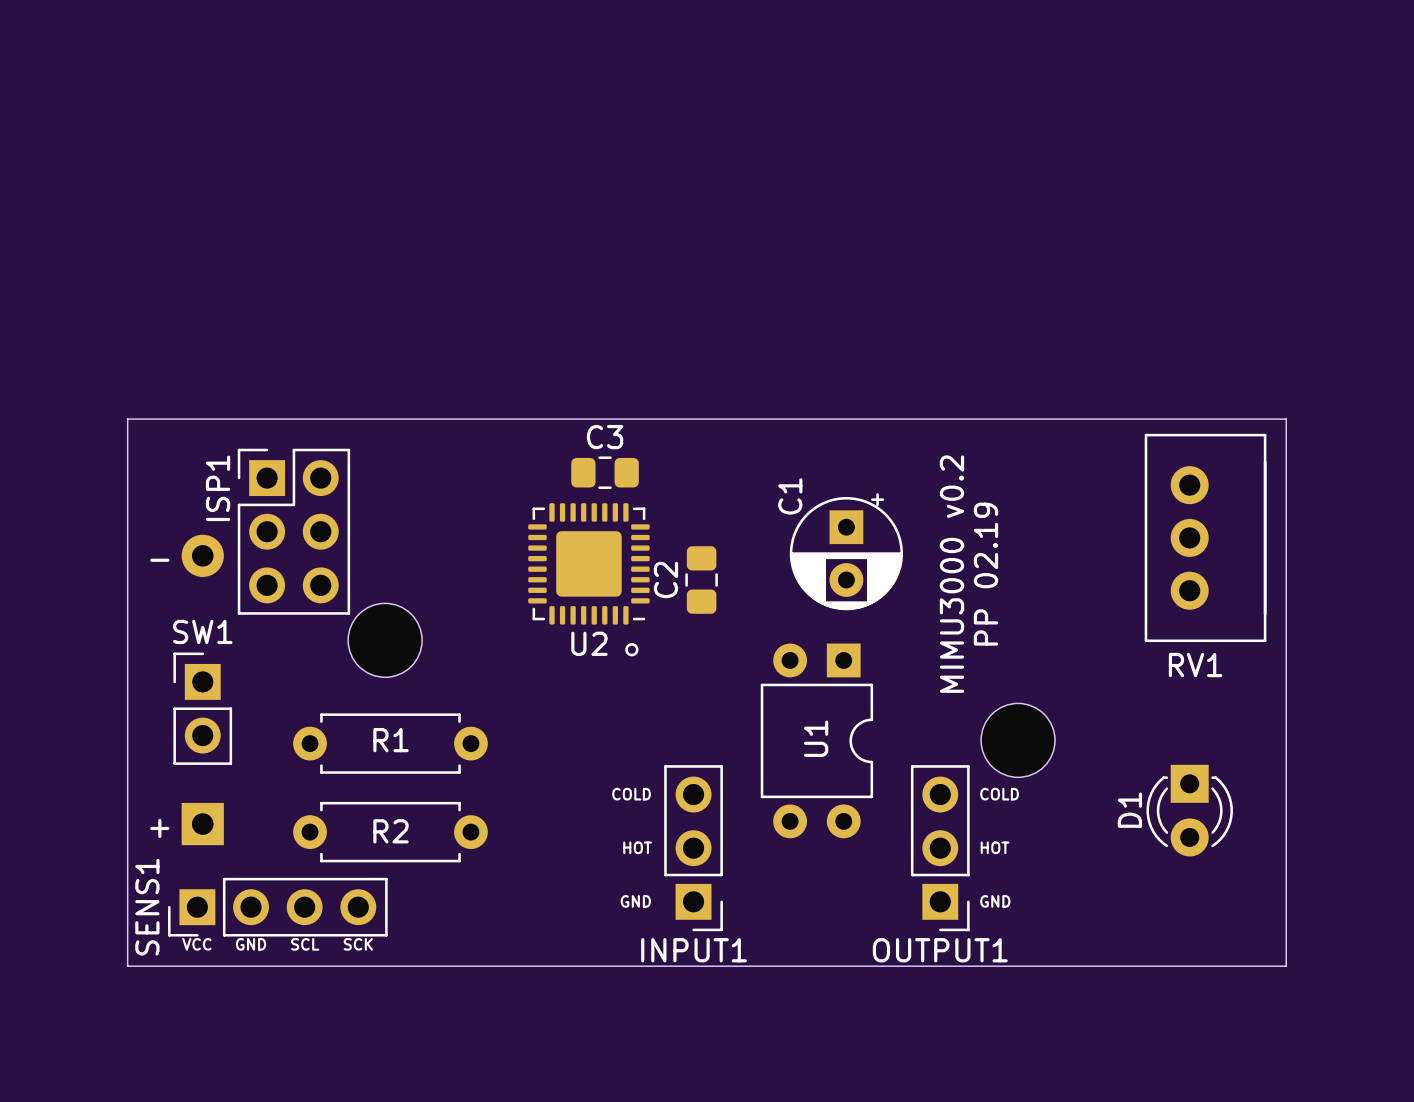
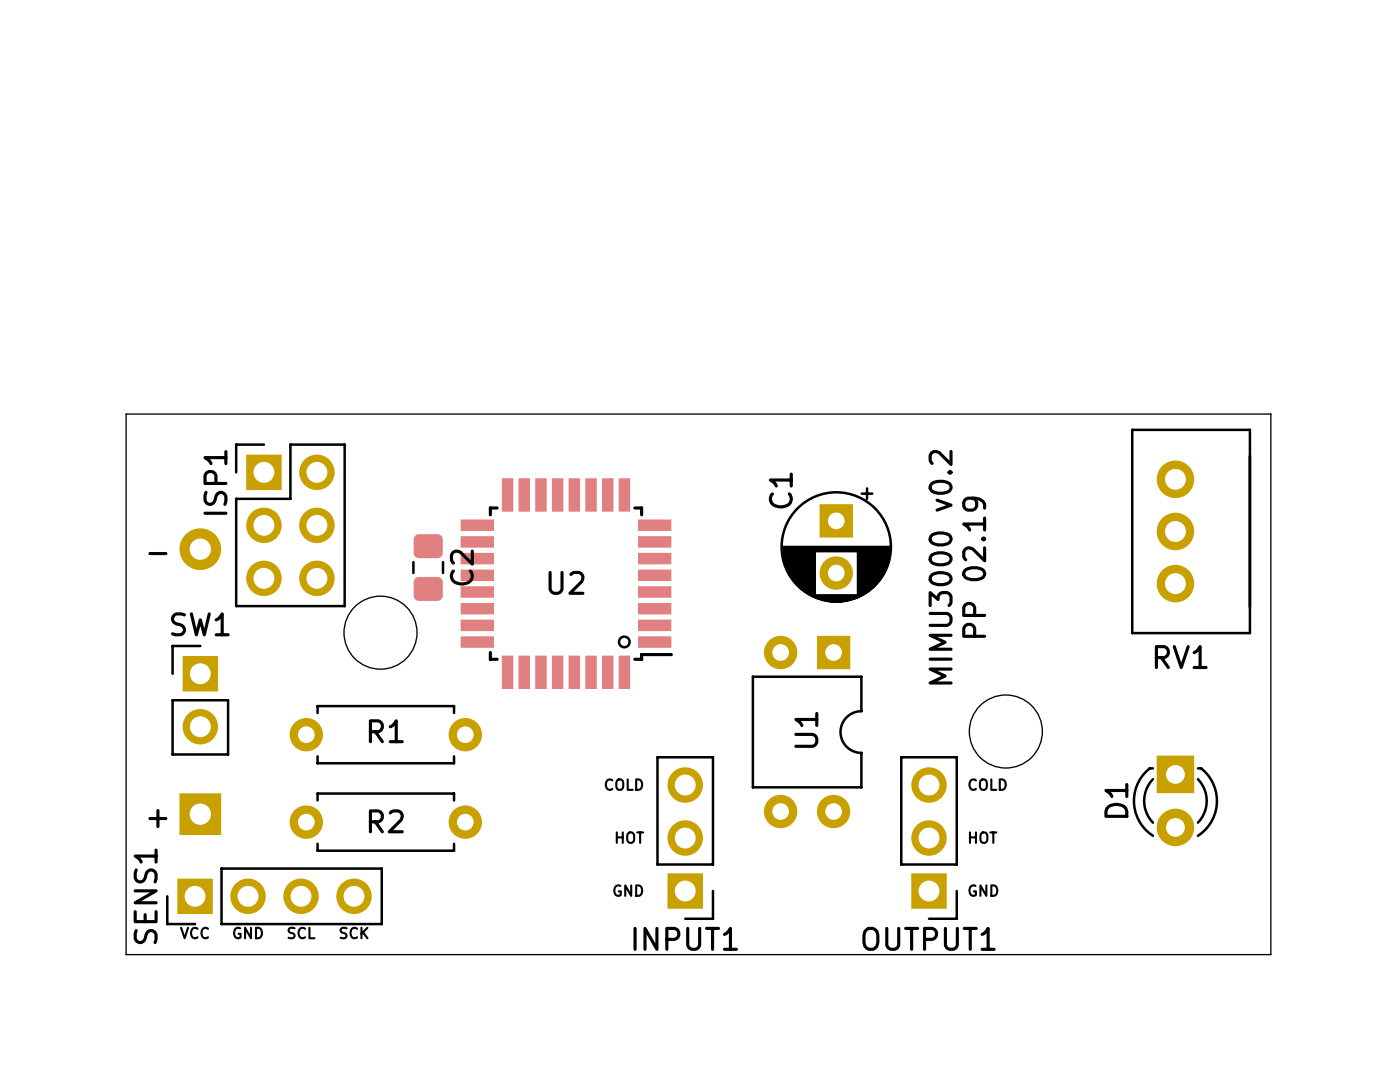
C3: (605, 472) -> none
U2 footprint: [528, 503, 650, 625] -> [460, 478, 673, 690]
C2 name position: C2 (665, 580) -> C2 (461, 567)
C2 position: (701, 580) -> (428, 567)
U2 name position: U2 (589, 643) -> U2 (566, 582)

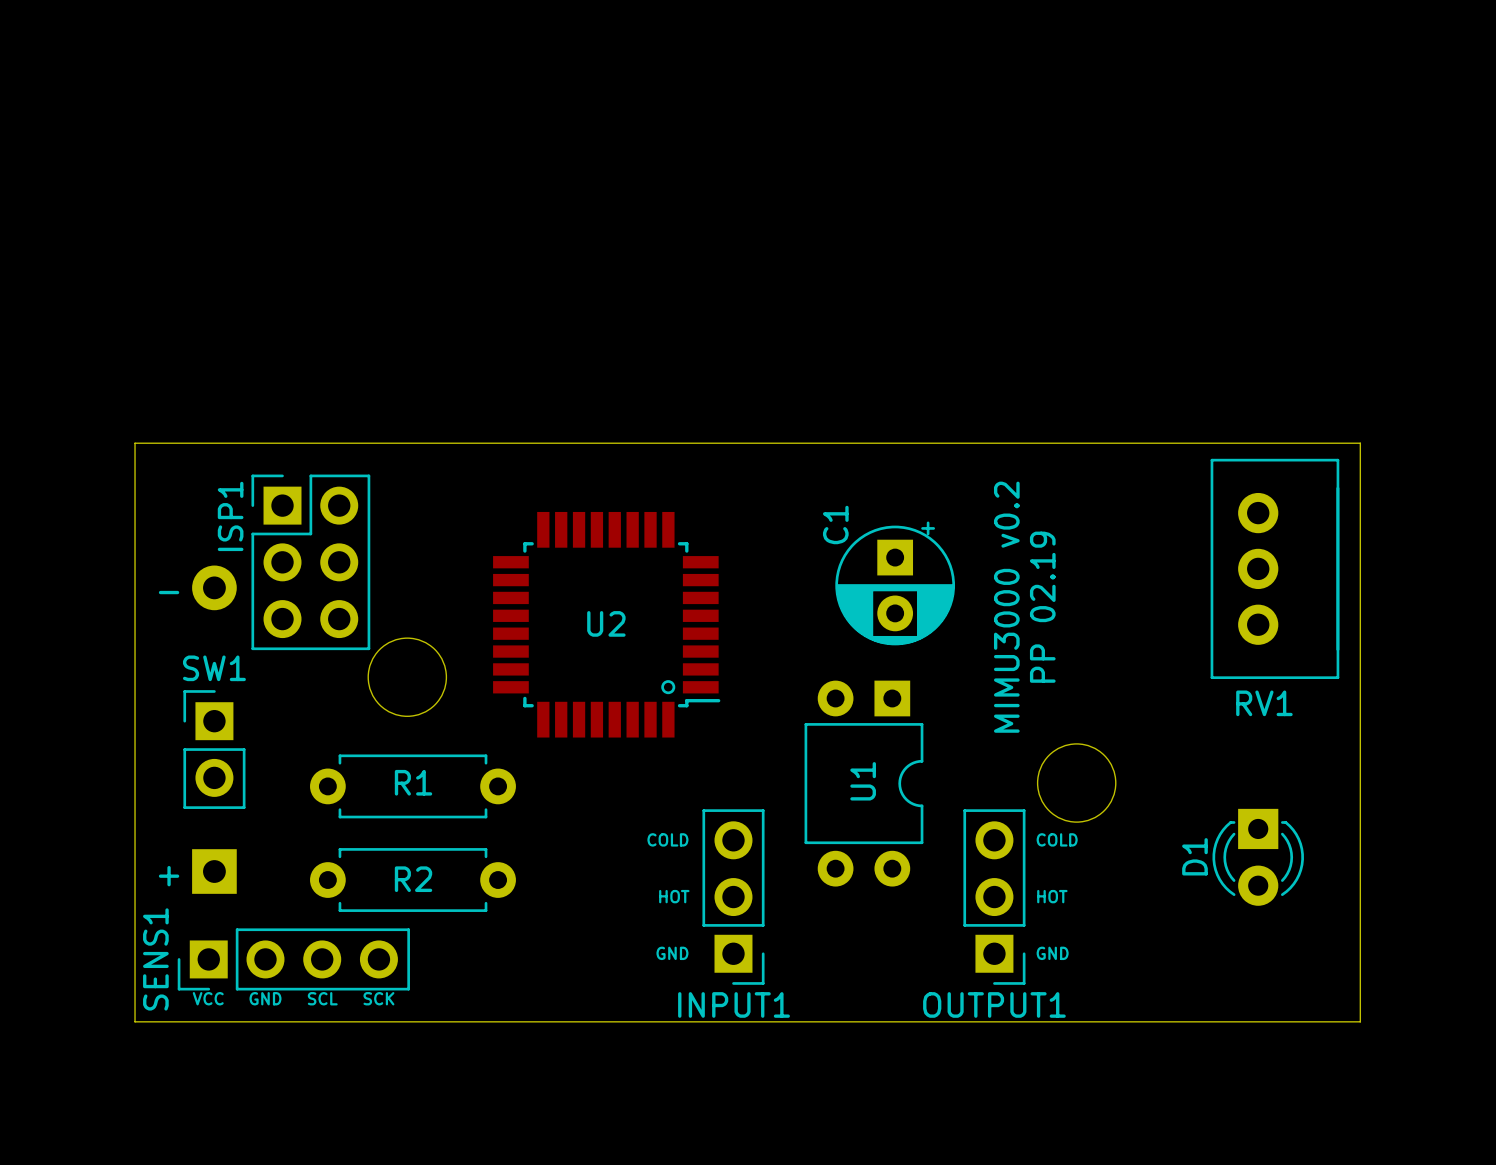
C2: (428, 567) -> none

